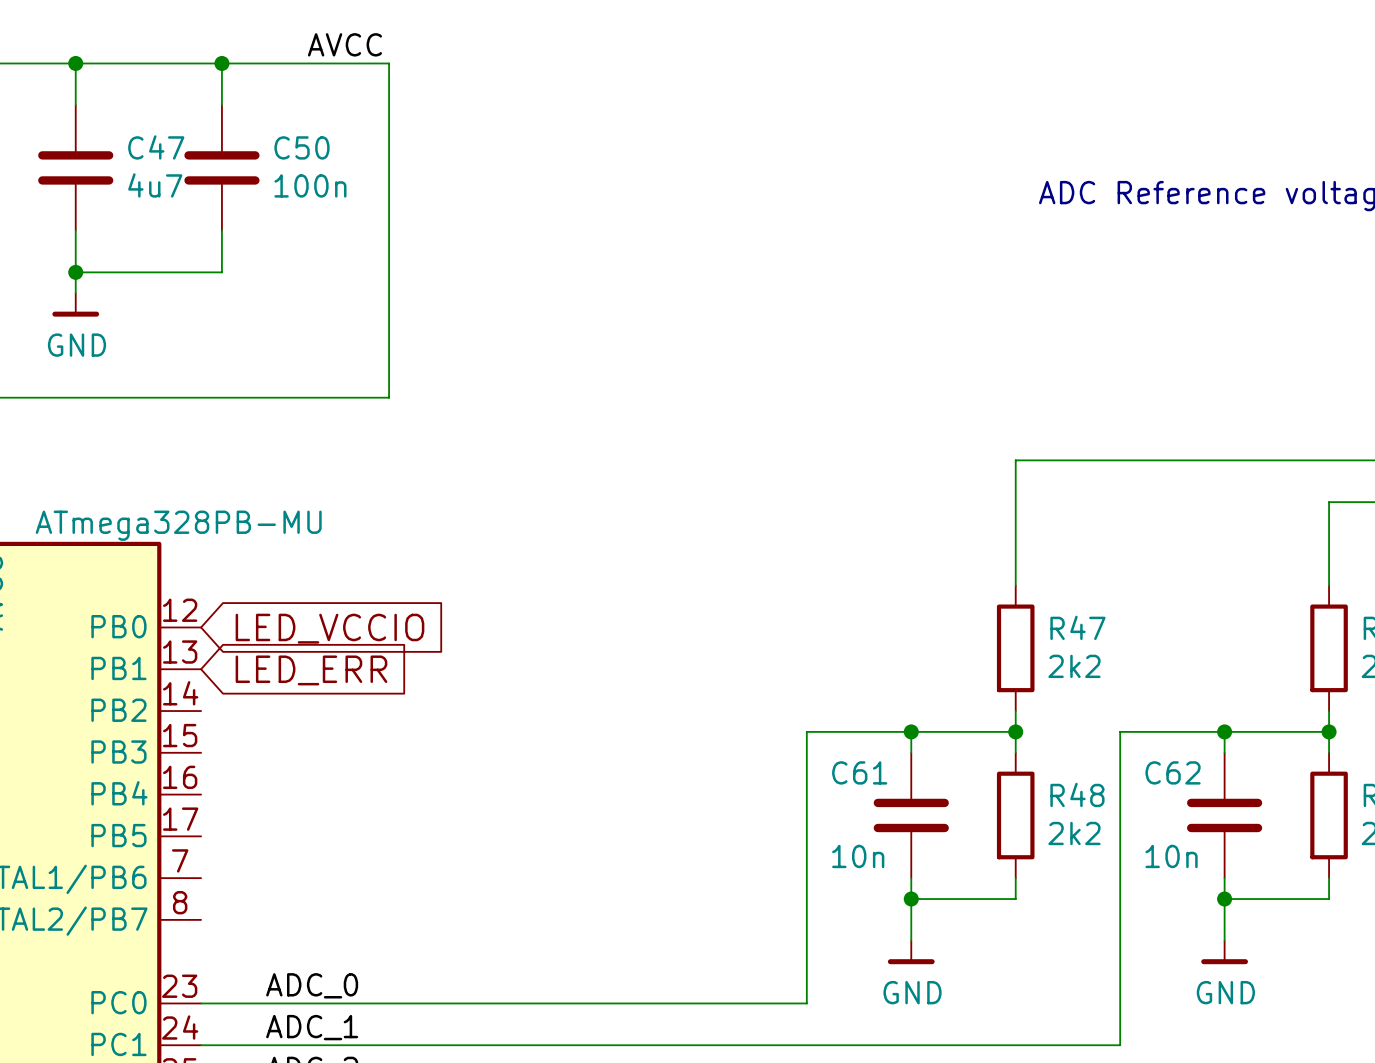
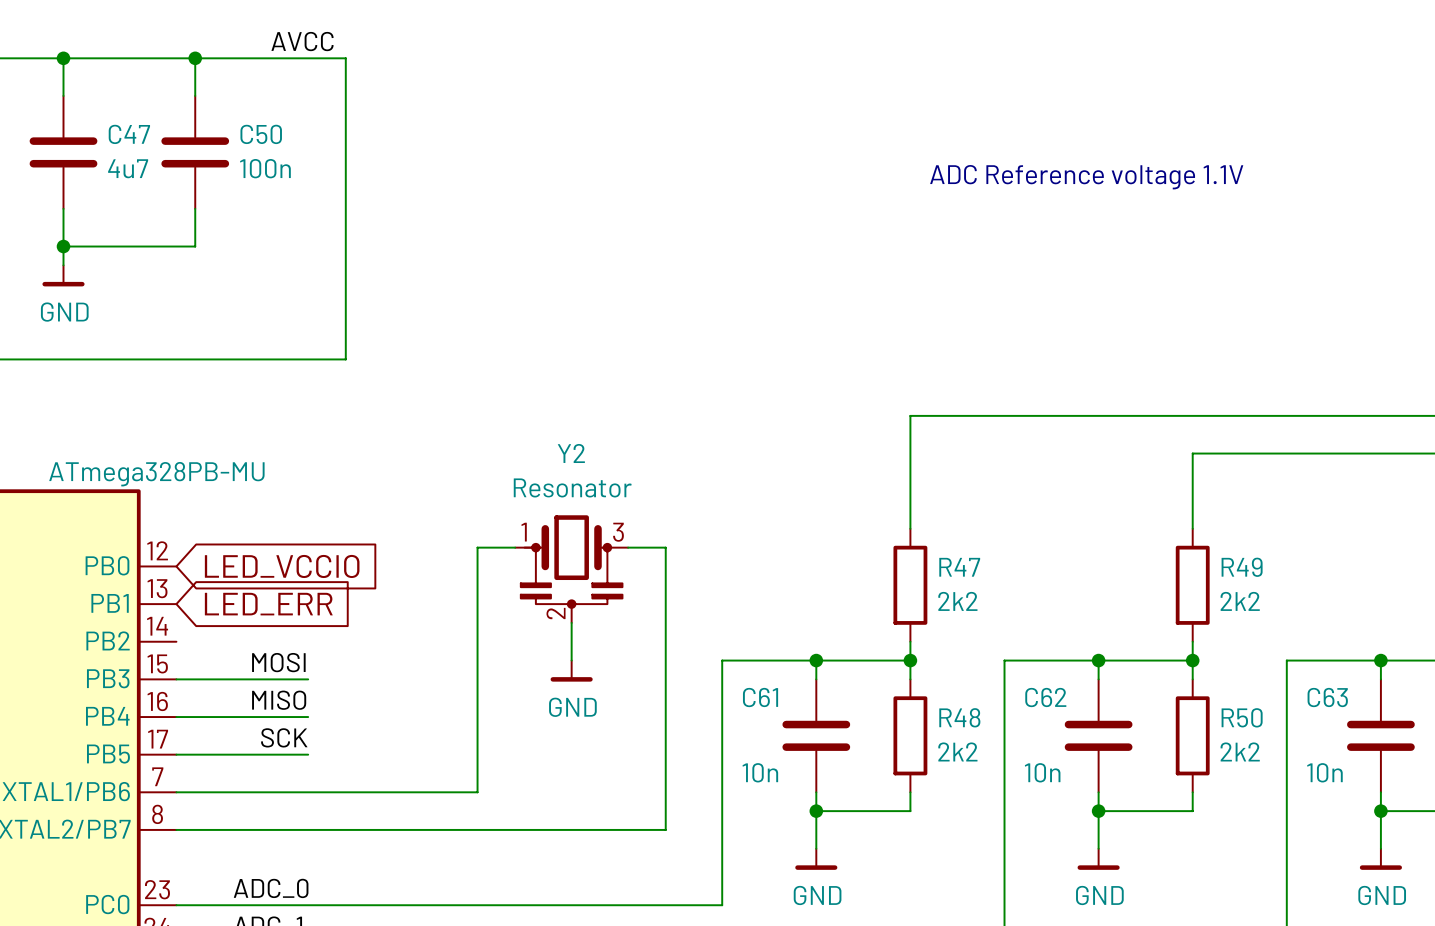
wire: none -> (515, 547) (477, 547) (477, 792) (176, 792)
wire: none -> (628, 547) (665, 547) (665, 829) (176, 829)
Y2: none -> Resonator (571, 569)
wire: none -> (571, 622) (571, 660)
label: none -> MOSI (278, 662)
power symbol: none -> GND (571, 671)
wire: none -> (176, 679) (308, 679)
label: none -> MISO (279, 700)
wire: none -> (176, 717) (308, 717)
label: none -> SCK (284, 737)
wire: none -> (176, 754) (308, 754)

